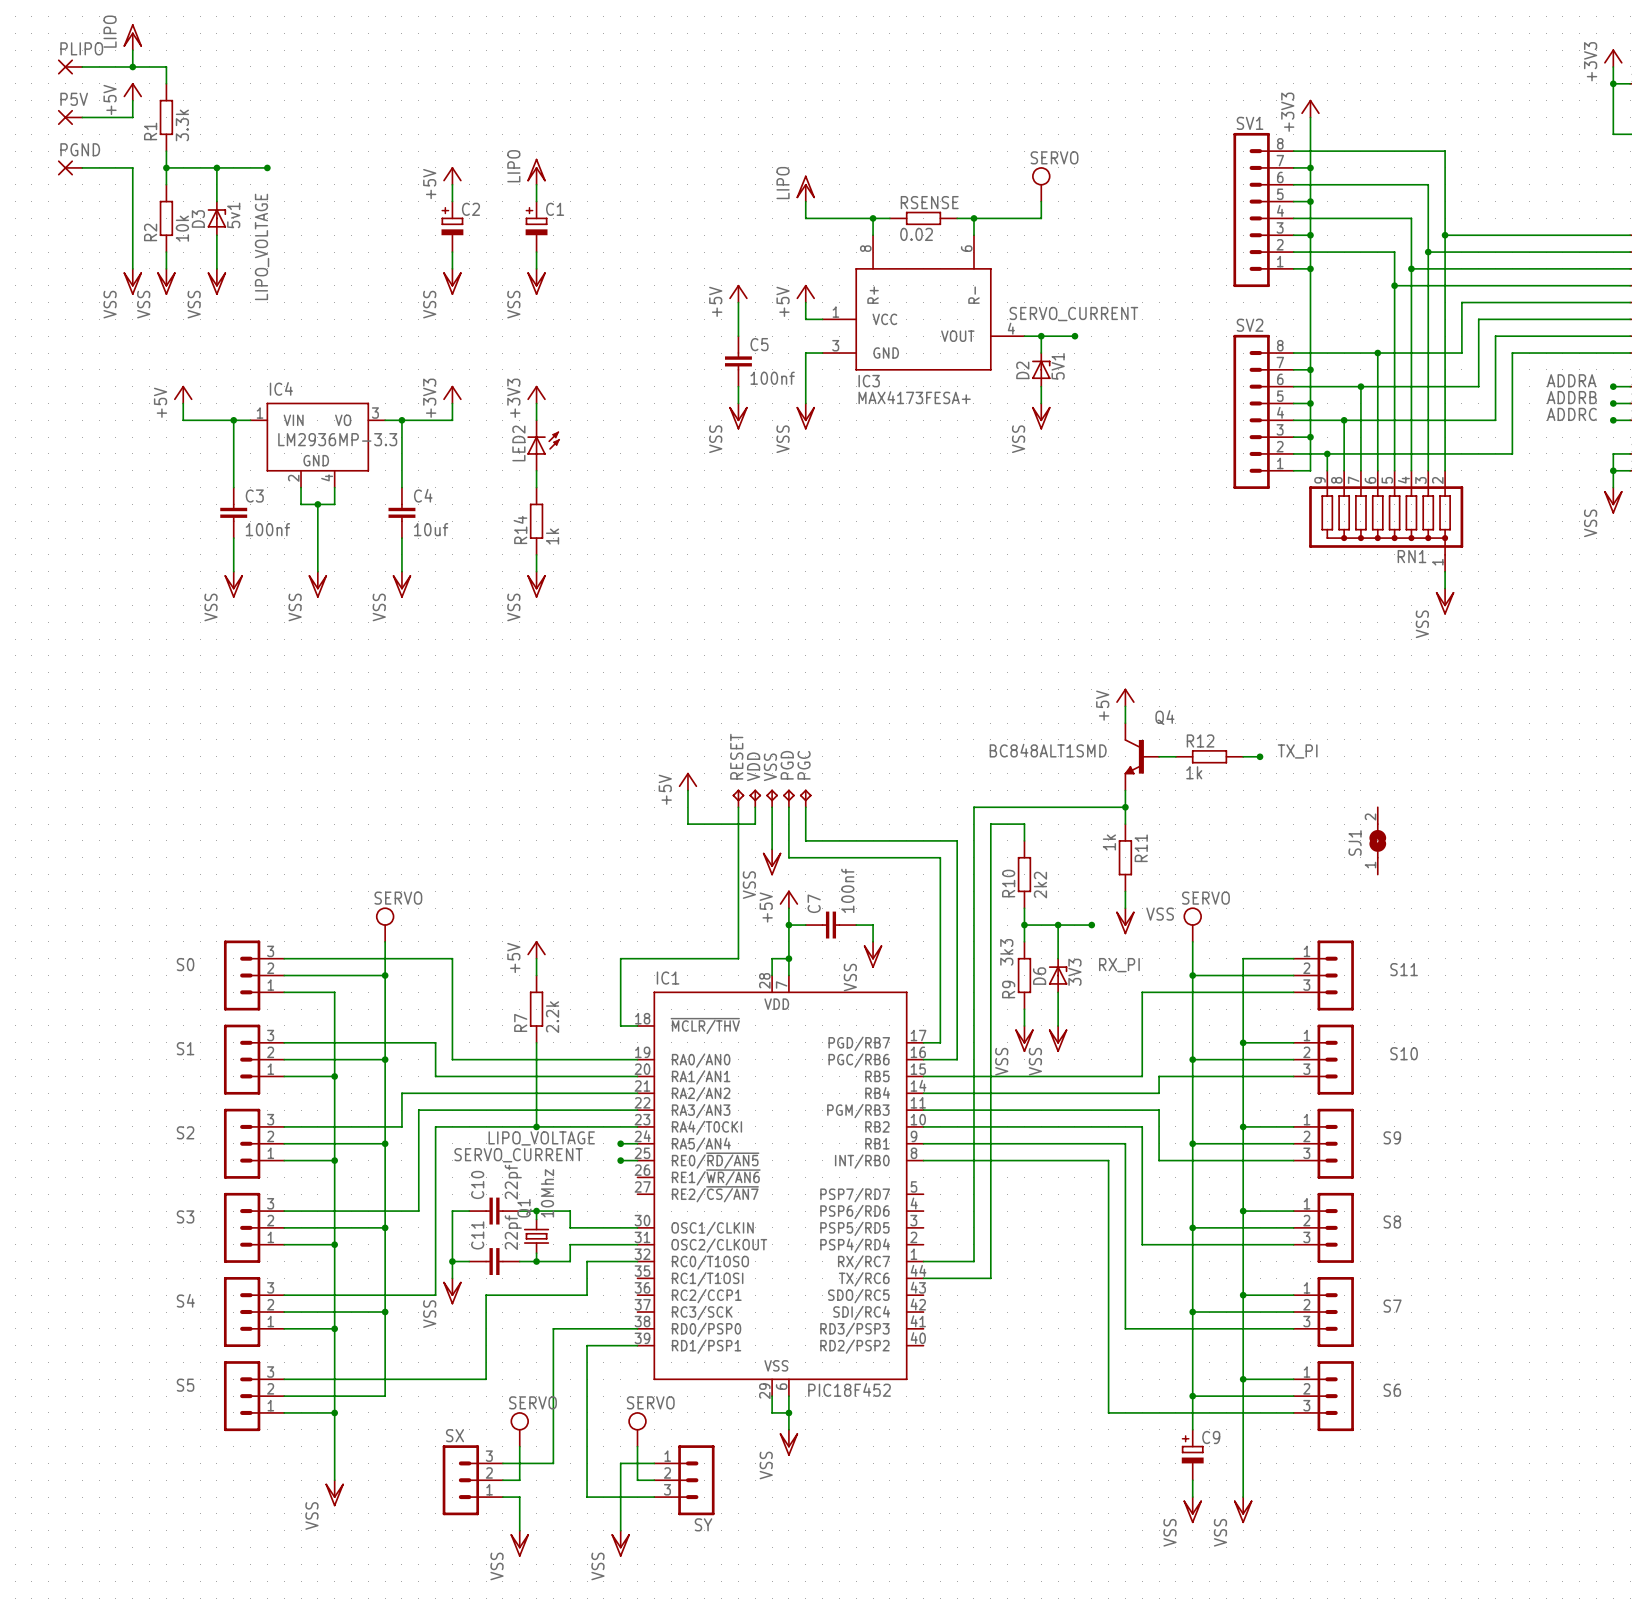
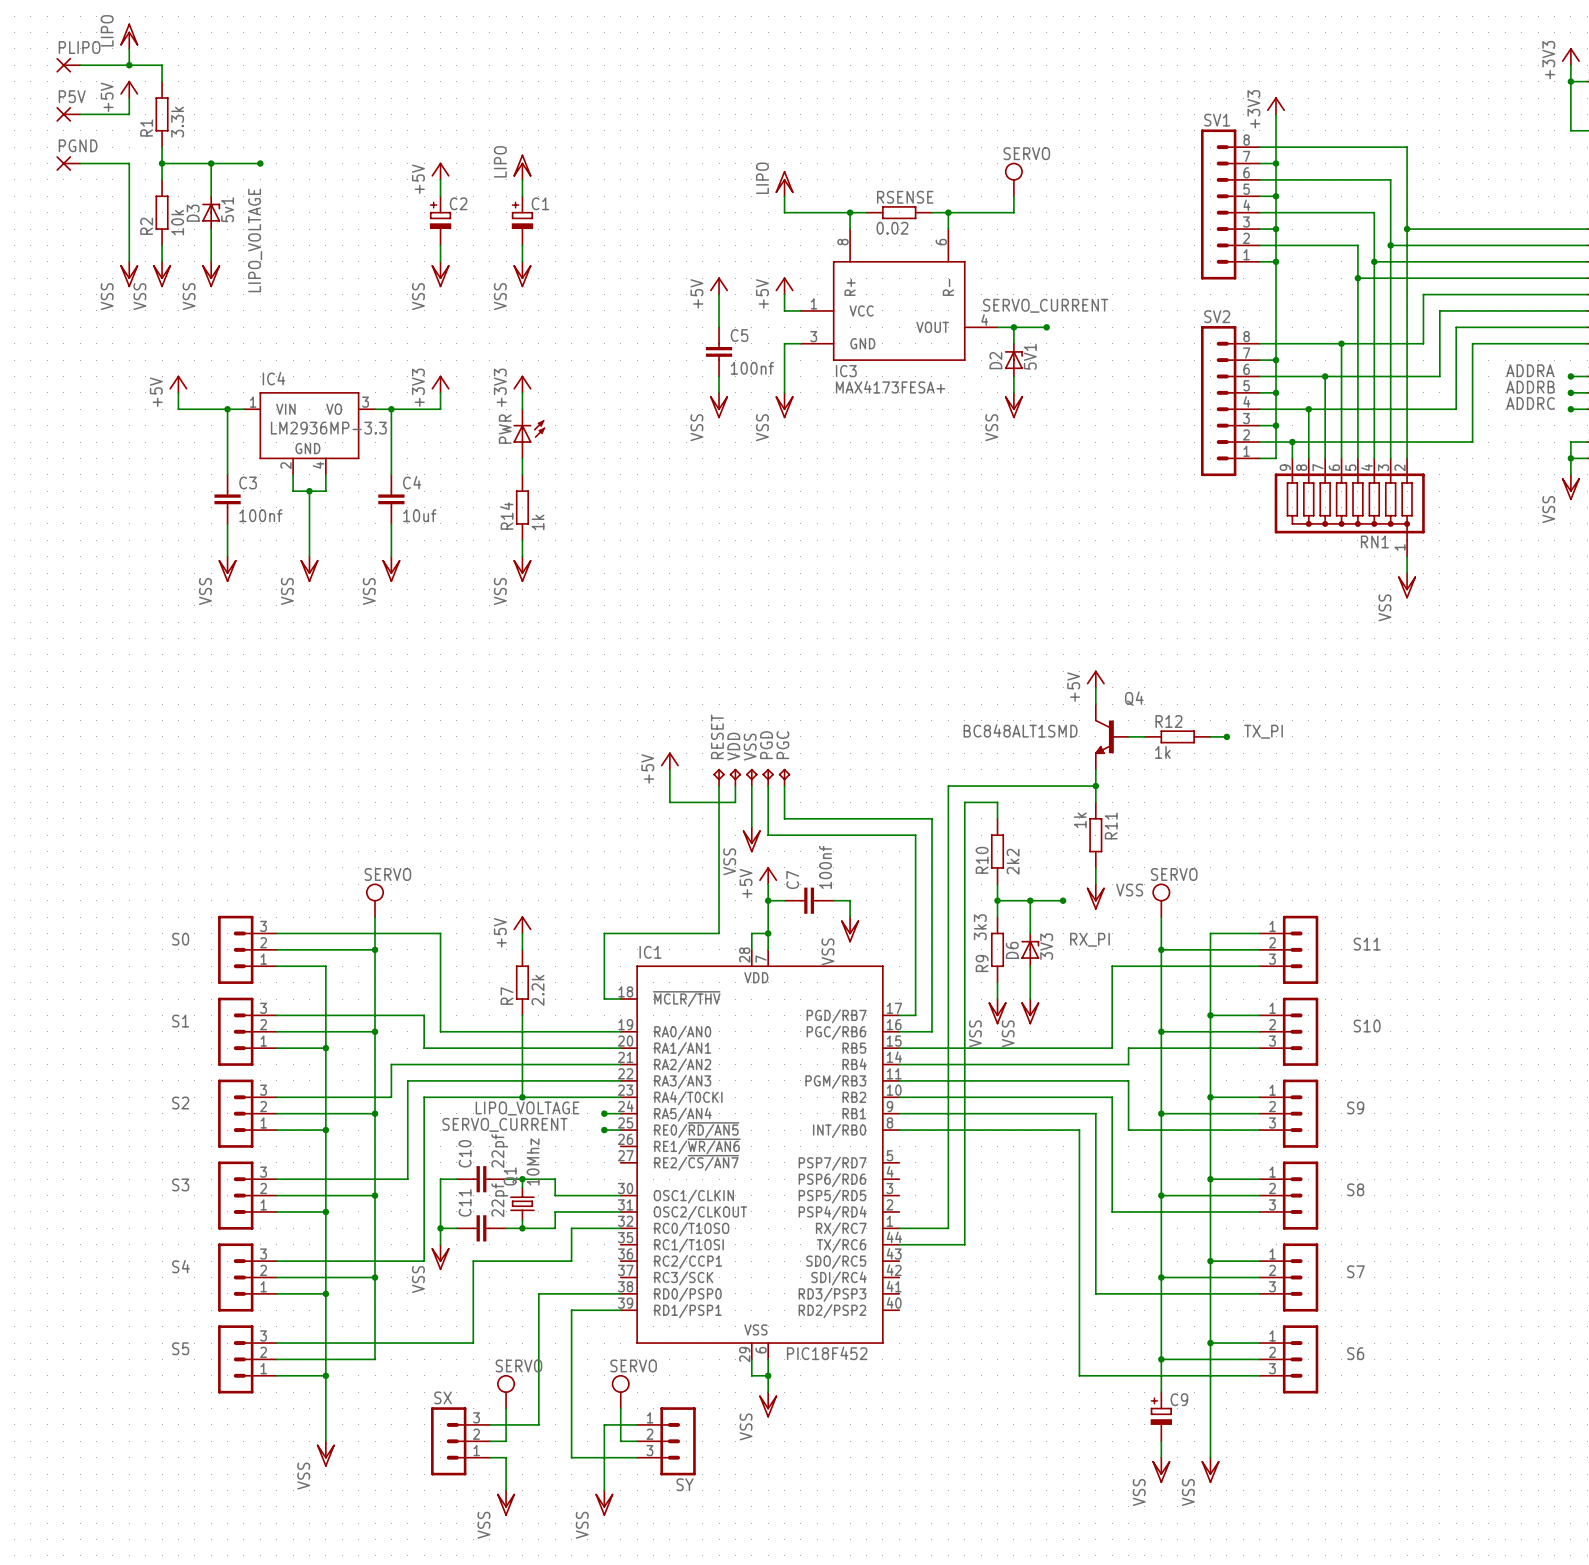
LED2 name: LED2 (518, 443) -> PWR (505, 429)
SJ1: (1377, 840) -> none

